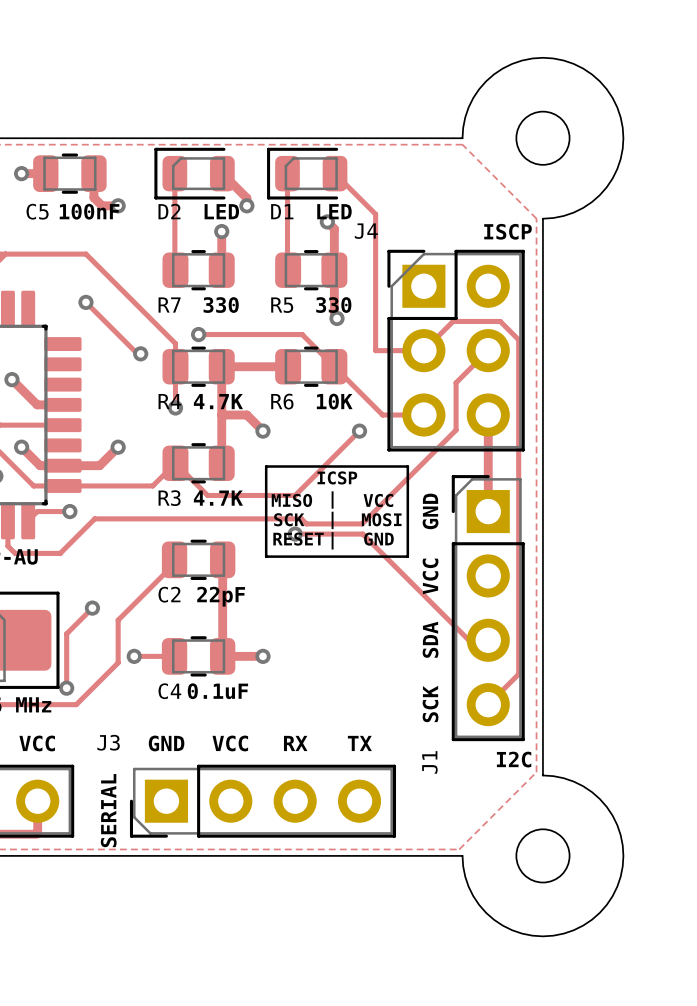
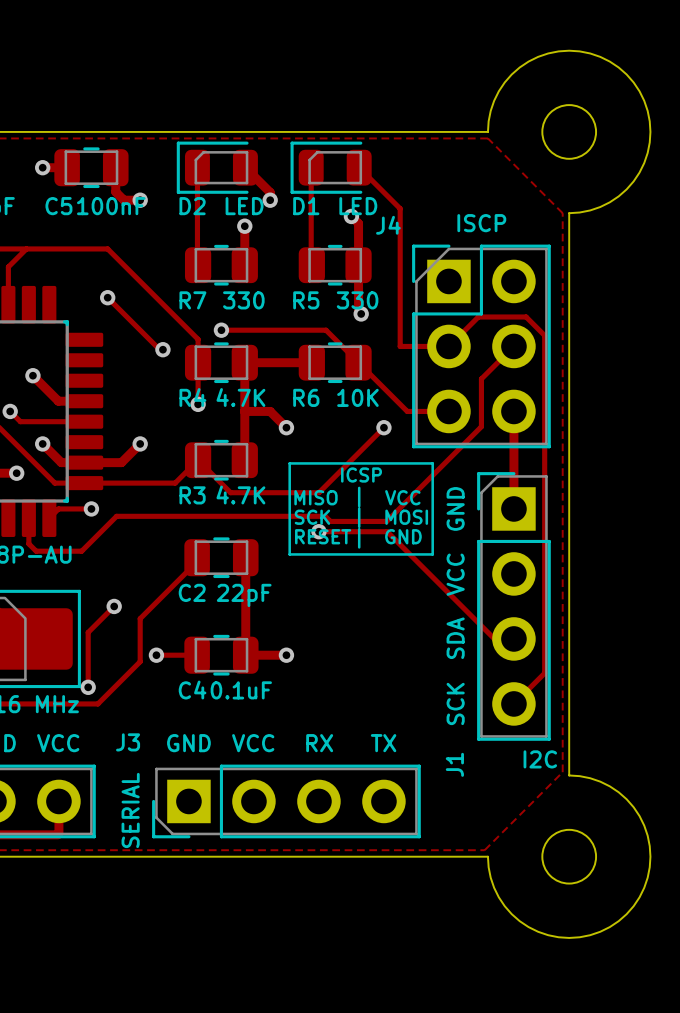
text position: ISCP (508, 231) -> ISCP (481, 223)

